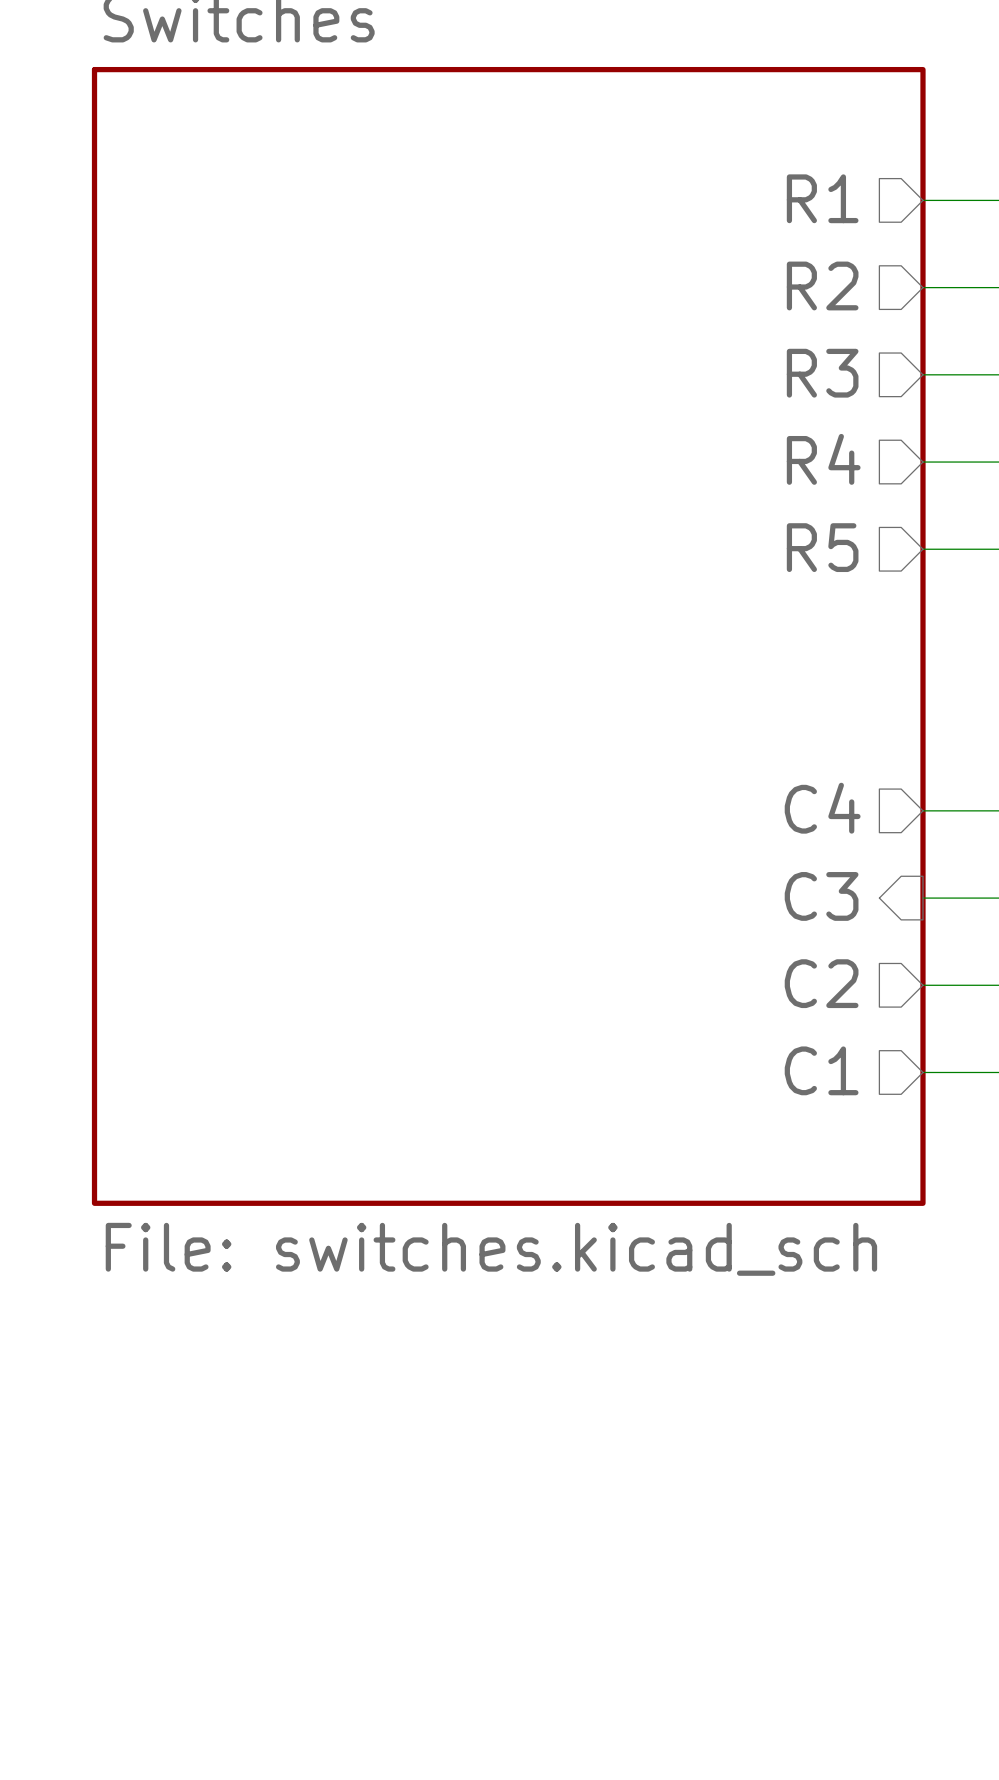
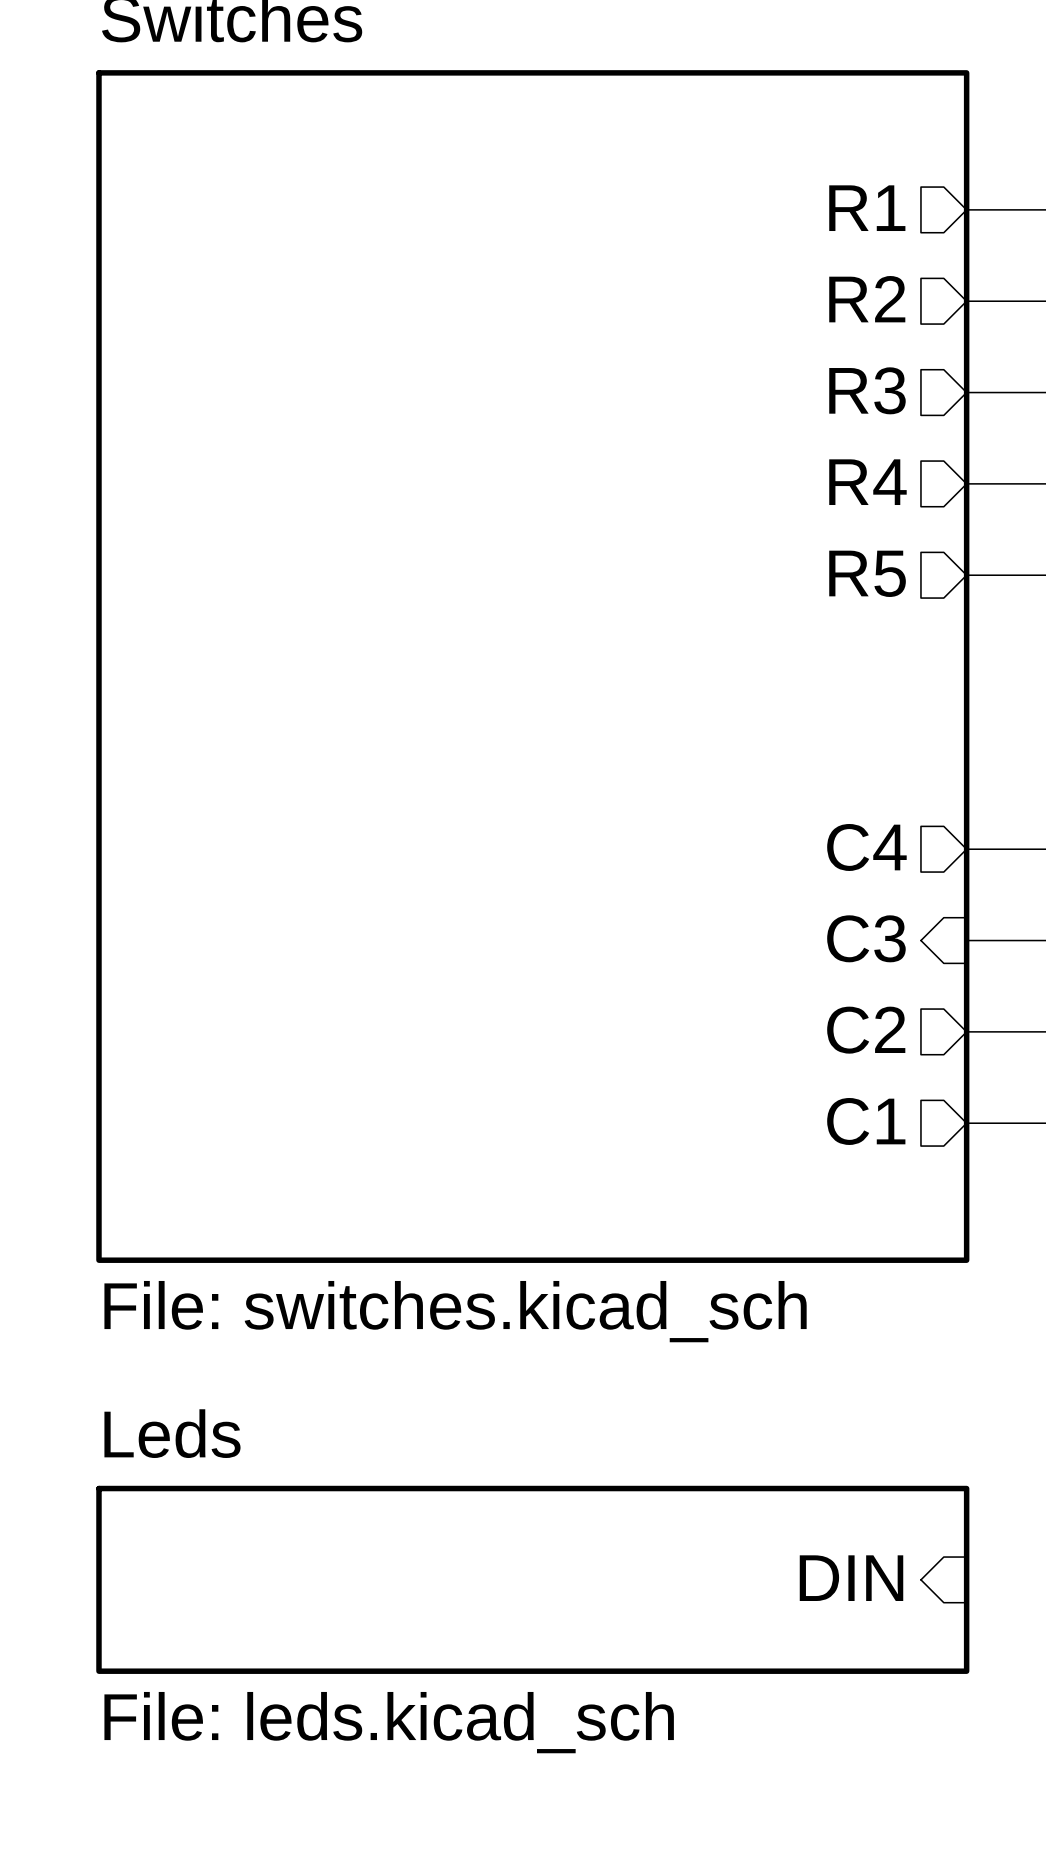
sheet pin: none -> DIN (851, 1578)
sheet Leds: none -> File: leds.kicad_sch (532, 1579)

